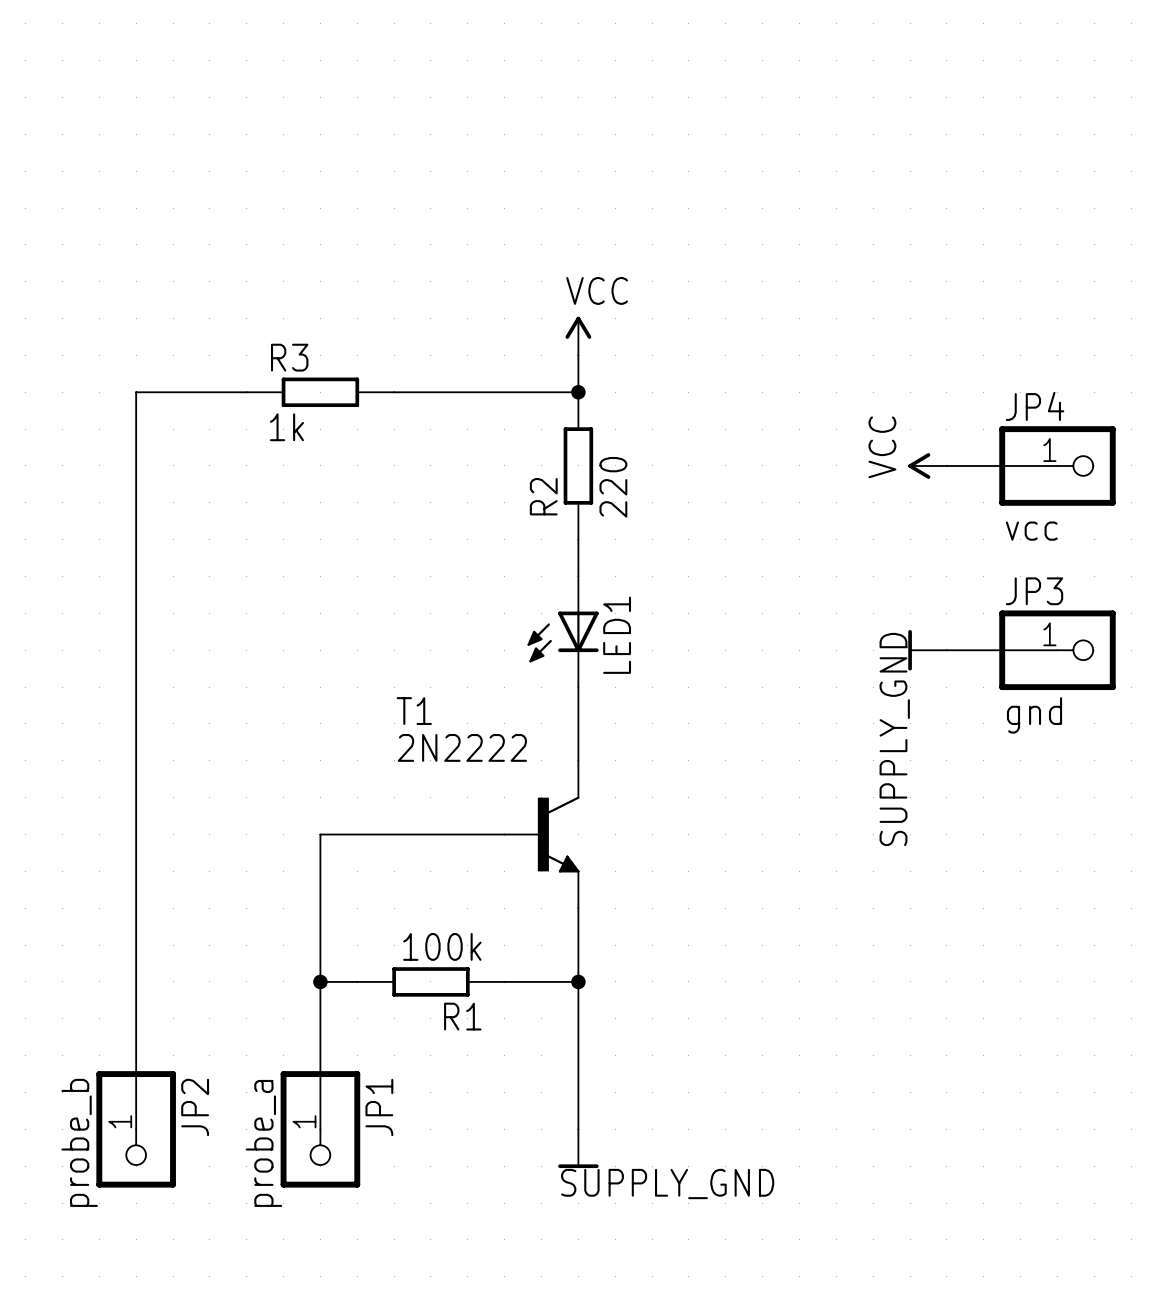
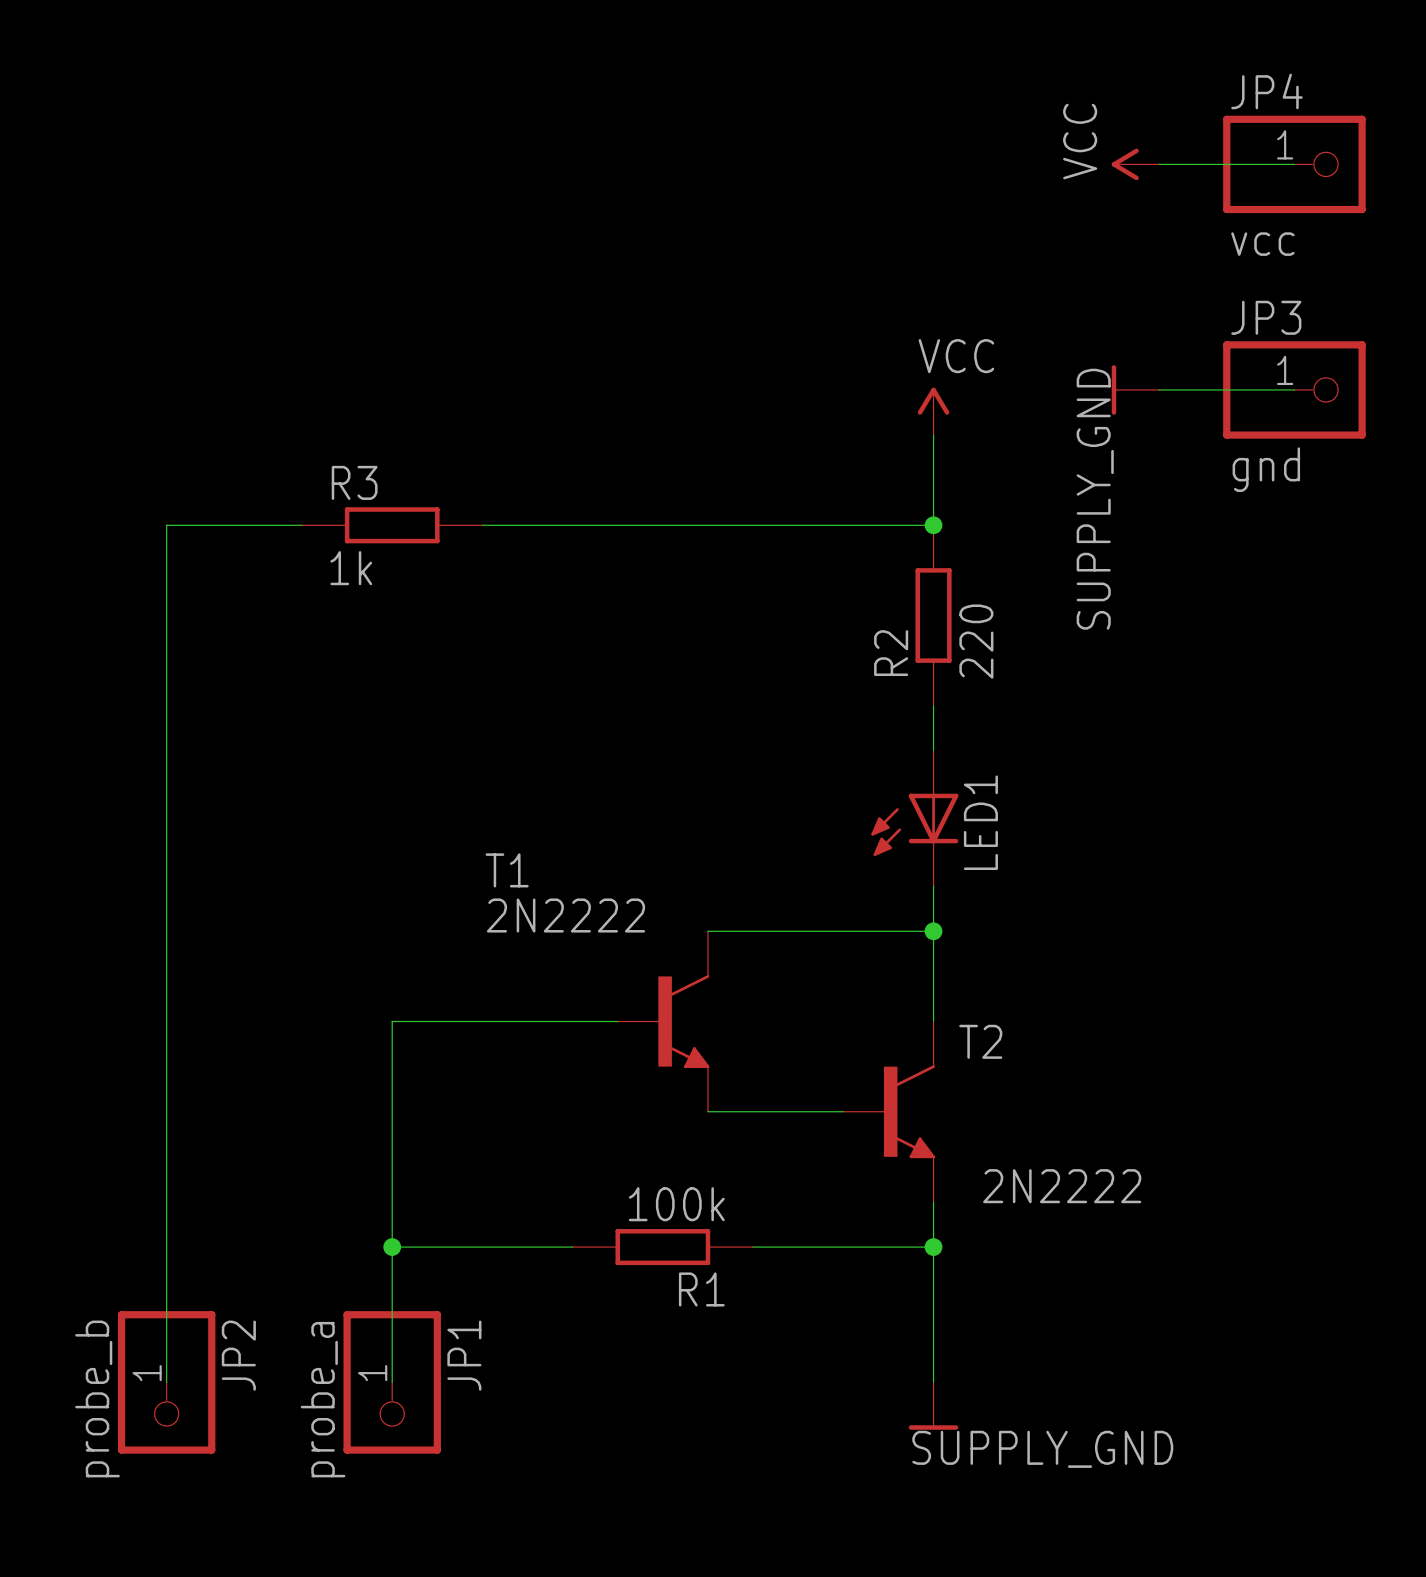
power symbol: none -> VCC (1135, 164)
power symbol: none -> SUPPLY_GND (1135, 389)
power symbol: VCC (578, 336) -> none
power symbol: none -> VCC (933, 411)
wire: (578, 355) (578, 392) (394, 392) -> none
wire: none -> (933, 435) (933, 525) (482, 525)
wire: (246, 392) (136, 392) (136, 429) -> (301, 525) (166, 525)
R3 position: (320, 392) -> (392, 525)
junction: (578, 392) -> none
junction: none -> (933, 525)
R2 position: (578, 465) -> (933, 615)
power symbol: VCC (927, 465) -> none
wire: (946, 465) (1057, 465) -> (1159, 164) (1294, 164)
JP4 position: (1057, 465) -> (1294, 164)
wire: (578, 539) (578, 576) -> (933, 705) (933, 750)
LED1 position: (563, 631) -> (914, 818)
power symbol: SUPPLY_GND (927, 650) -> none
wire: (946, 650) (1057, 650) -> (1159, 389) (1294, 389)
JP3 position: (1057, 650) -> (1294, 389)
wire: (578, 687) (578, 760) -> (933, 931) (707, 931)
wire: none -> (933, 886) (933, 1021)
junction: none -> (933, 931)
wire: (578, 908) (578, 1129) -> (707, 1111) (843, 1111)
T2: none -> 2N2222 (889, 1111)
wire: (320, 981) (357, 981) -> none
junction position: (320, 981) -> (392, 1247)
R1 position: (430, 981) -> (662, 1247)
wire: (504, 981) (578, 981) -> none
junction: (578, 981) -> none
wire: none -> (933, 1201) (933, 1382)
wire: none -> (392, 1247) (572, 1247)
wire: none -> (753, 1247) (933, 1247)
junction: none -> (933, 1247)
power symbol position: SUPPLY_GND (578, 1148) -> SUPPLY_GND (933, 1406)

